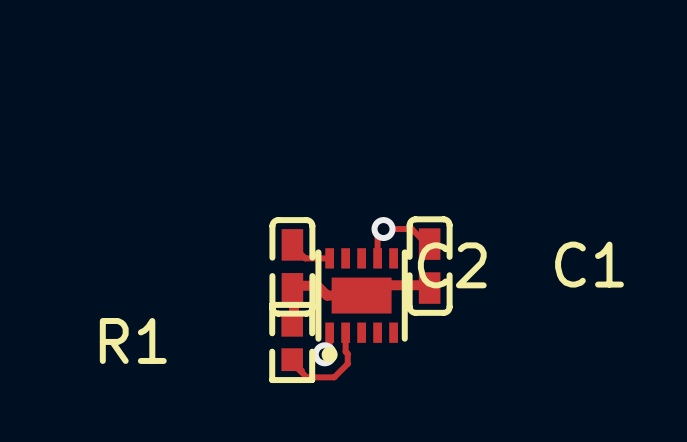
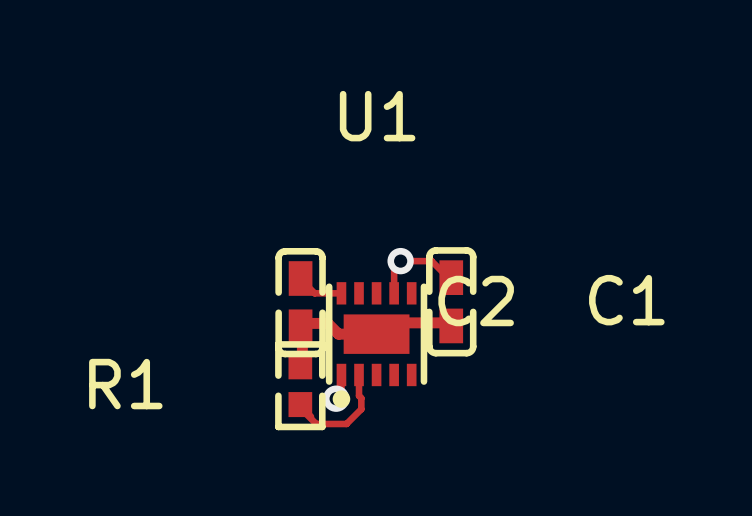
U1 name: none -> U1 (377, 116)

